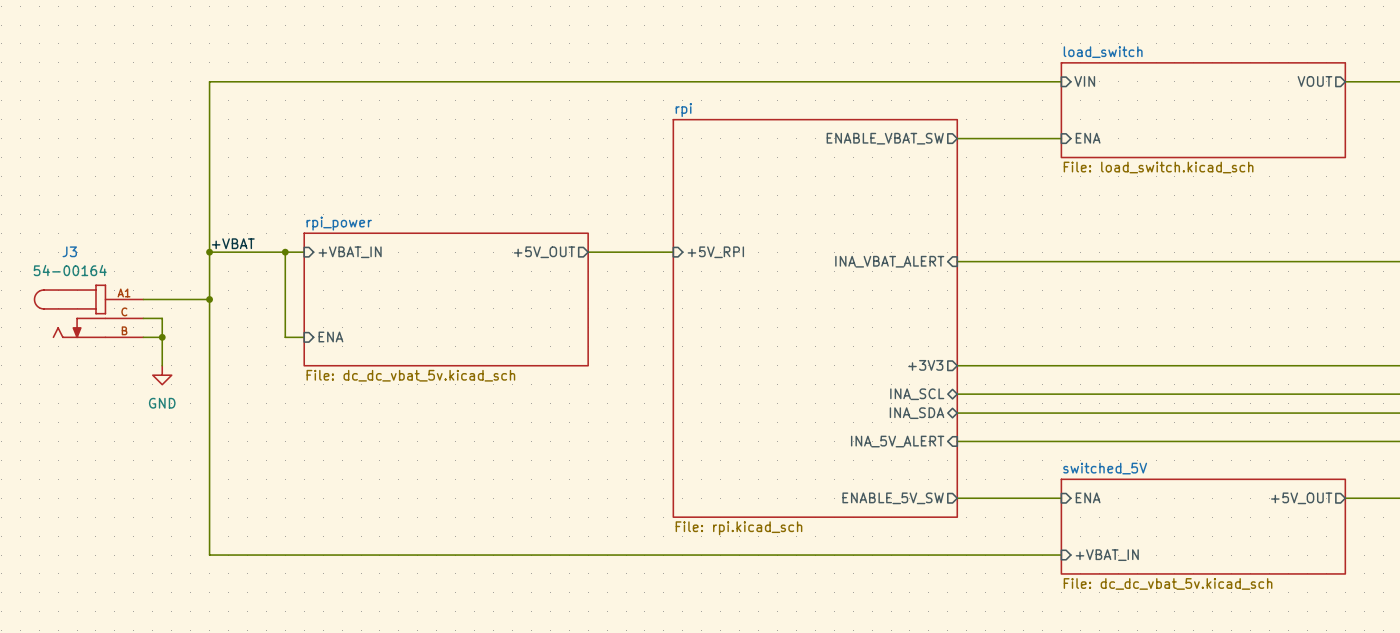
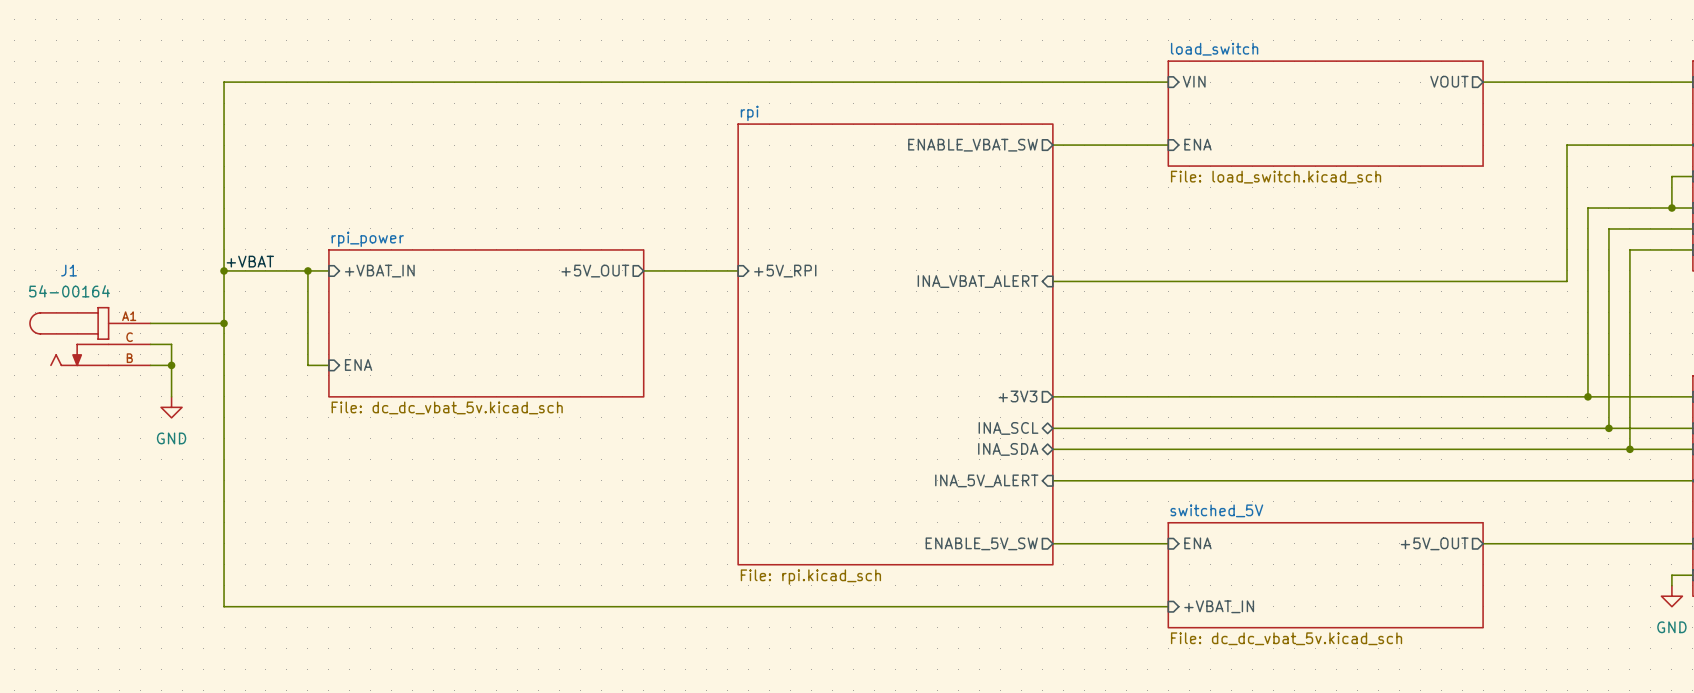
J3 name: J3 (69, 251) -> J1 (69, 270)

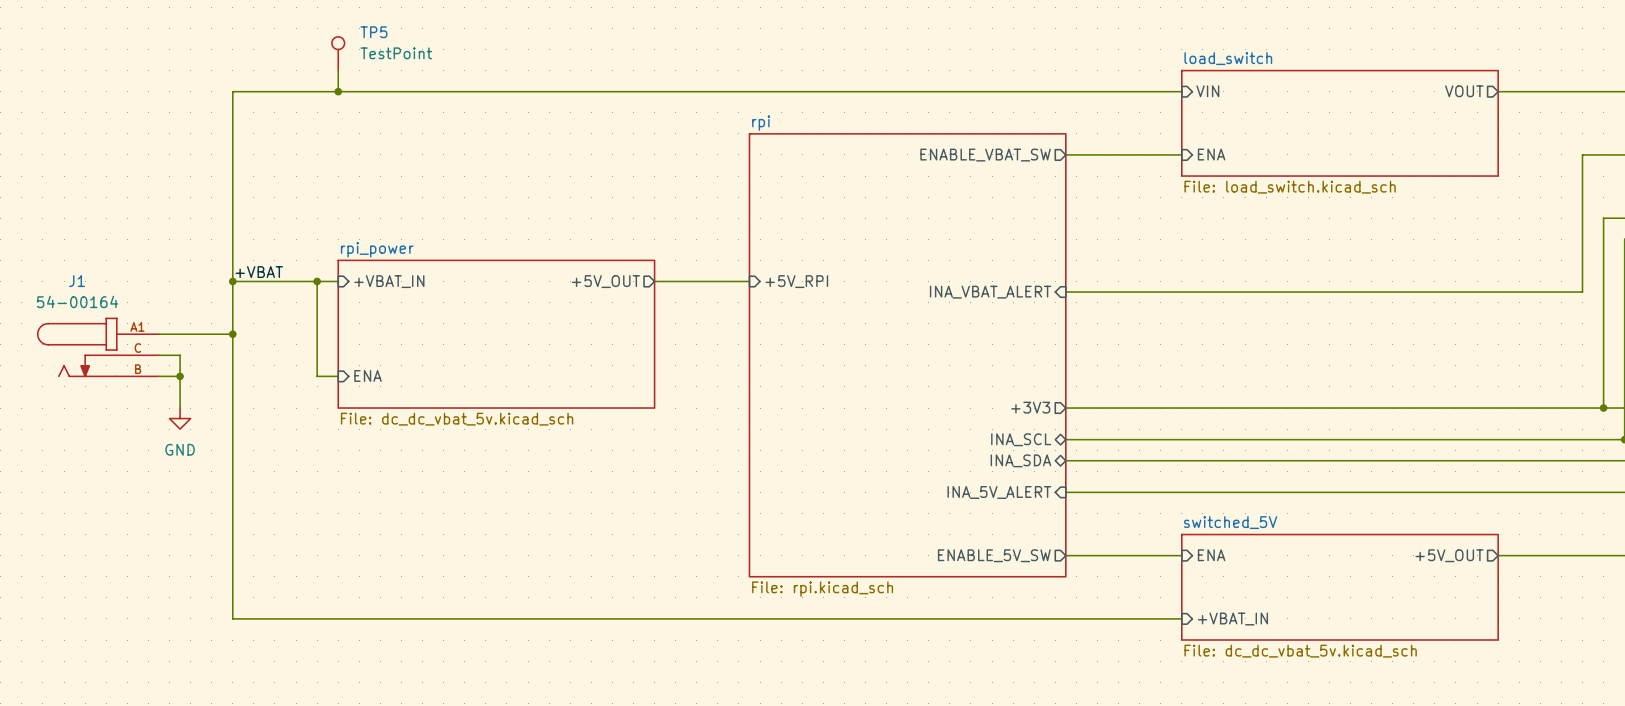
TP5: none -> TestPoint (338, 53)
wire: none -> (338, 70) (338, 91)
junction: none -> (338, 91)

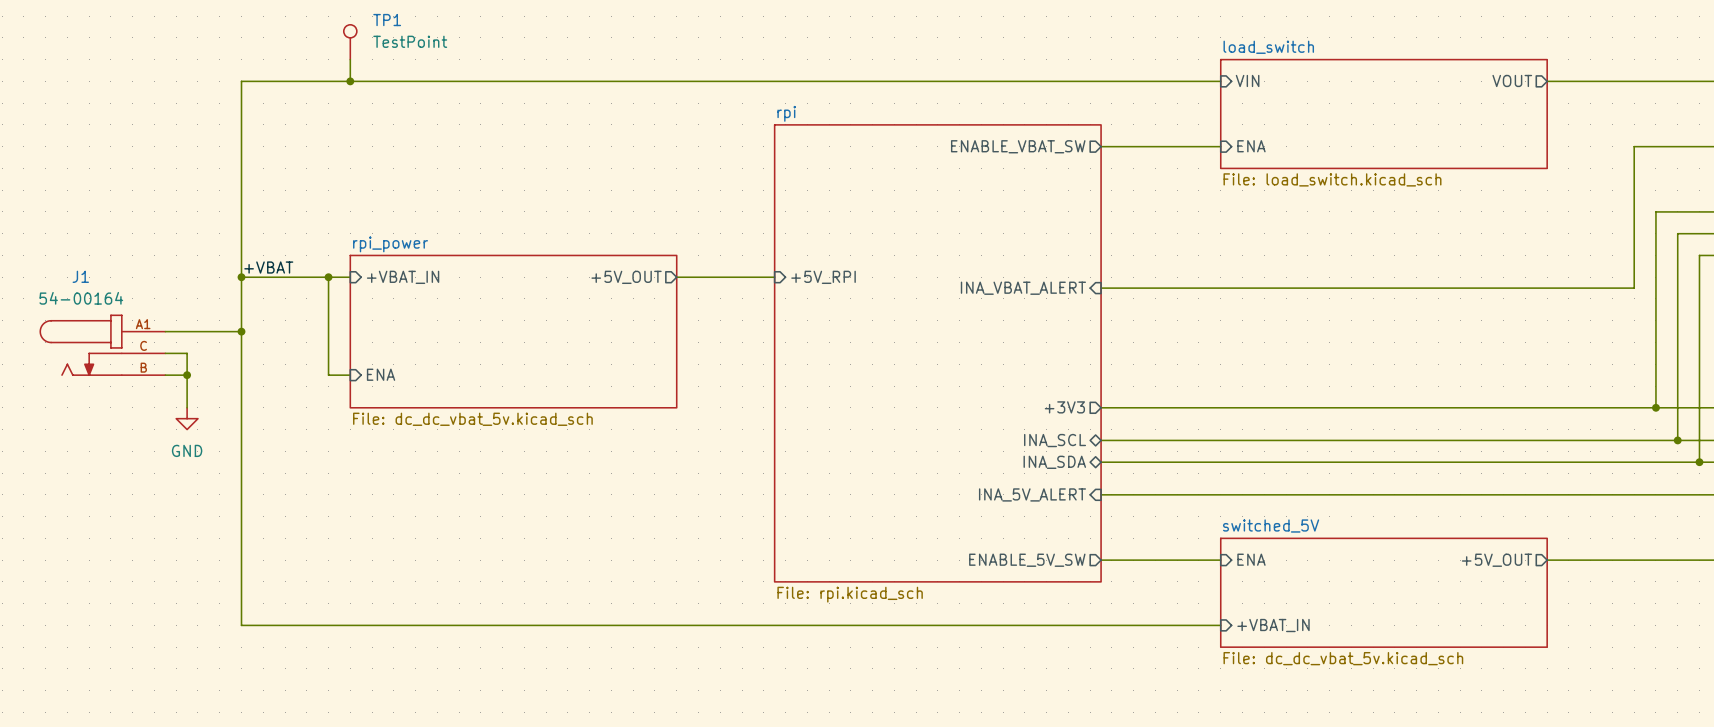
TP5 name: TP5 (373, 32) -> TP1 (387, 20)

